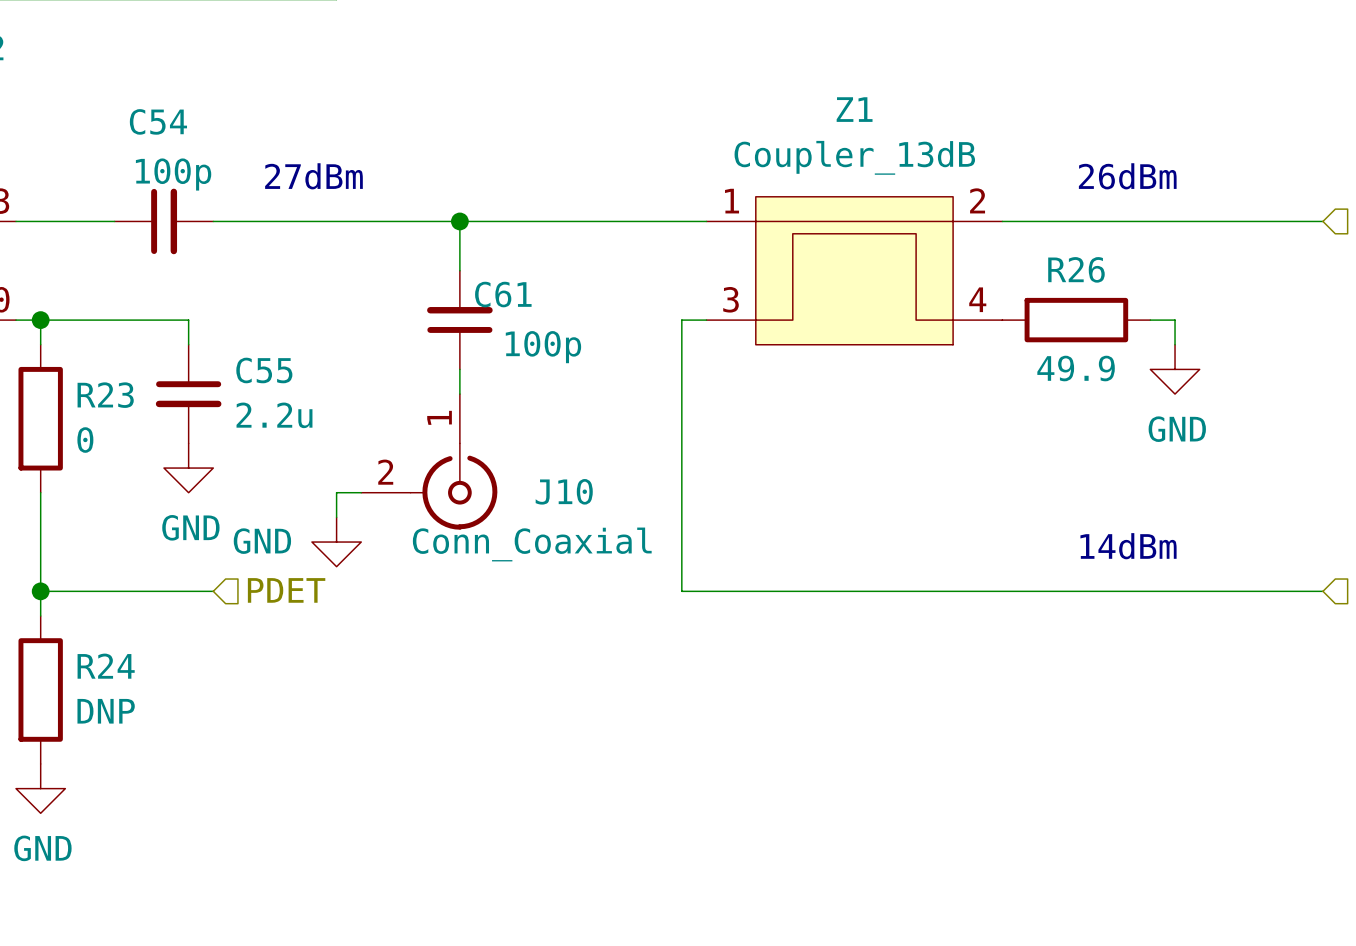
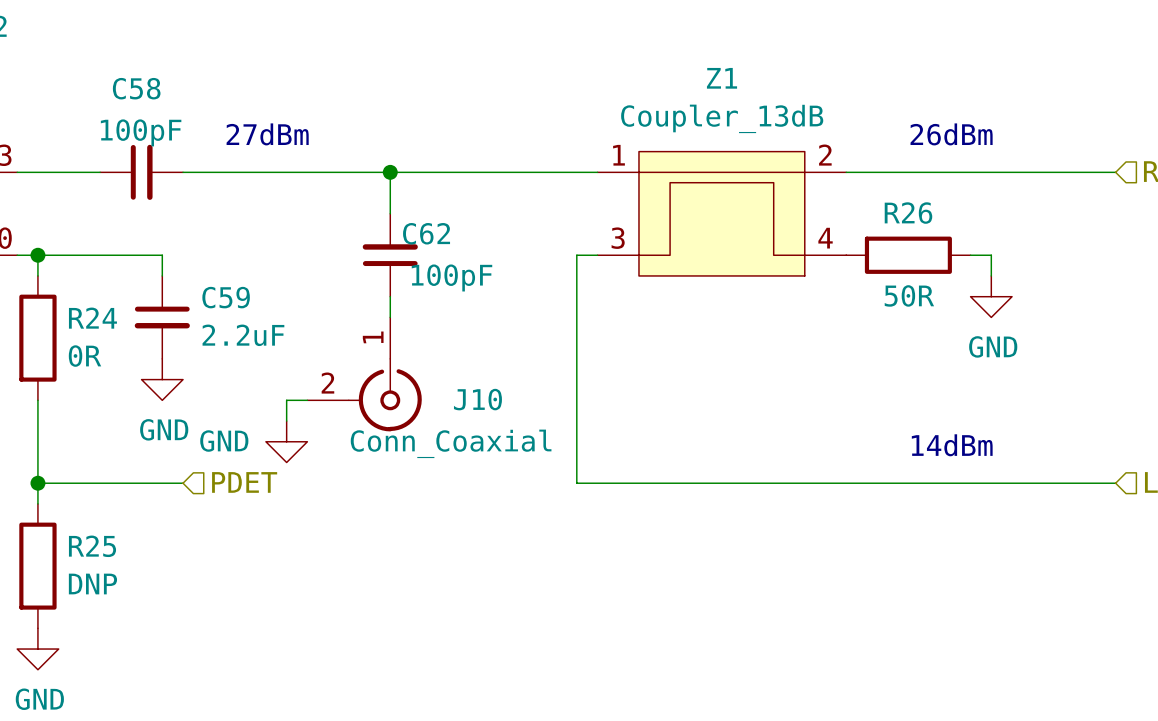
C54 name: C54 (158, 121) -> C58 (136, 88)
C54 value: 100p (173, 174) -> 100pF (141, 132)
C61 name: C61 (503, 294) -> C62 (426, 233)
C61 value: 100p (543, 347) -> 100pF (451, 277)
R26 value: 49.9 (1076, 368) -> 50R (909, 295)
C55 name: C55 (264, 370) -> C59 (226, 297)
R23 name: R23 (105, 395) -> R24 (92, 318)
C55 value: 2.2u (274, 415) -> 2.2uF (243, 335)
R23 value: 0 (85, 440) -> 0R (85, 356)
R24 name: R24 (106, 666) -> R25 (92, 546)

